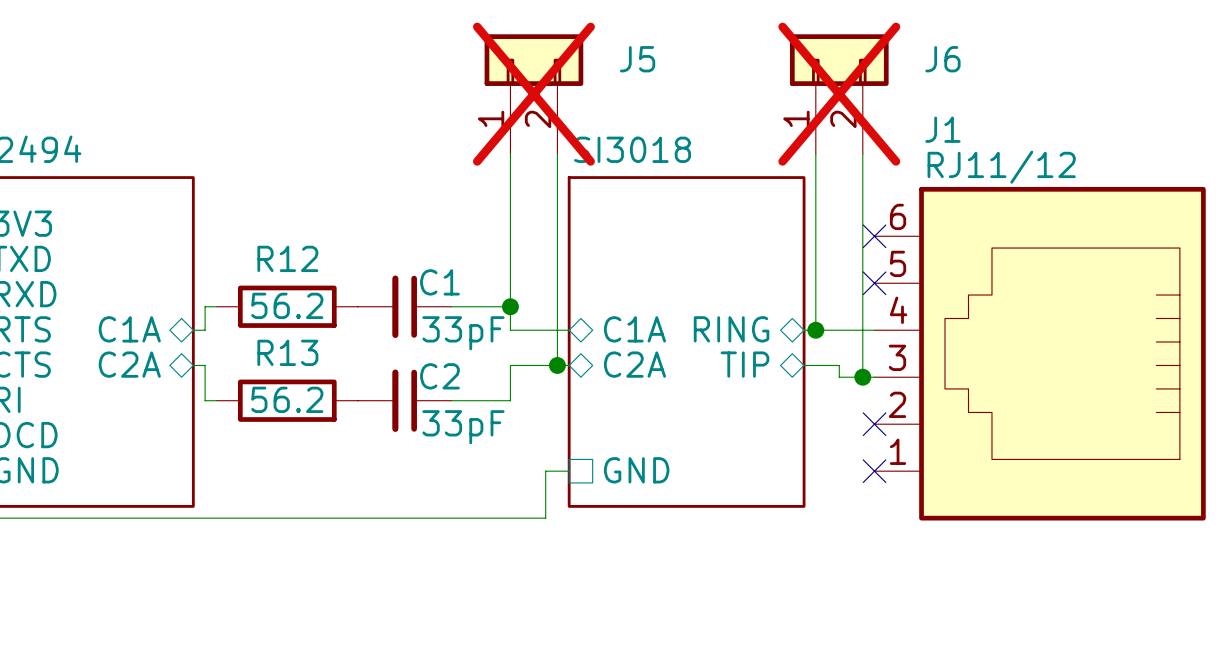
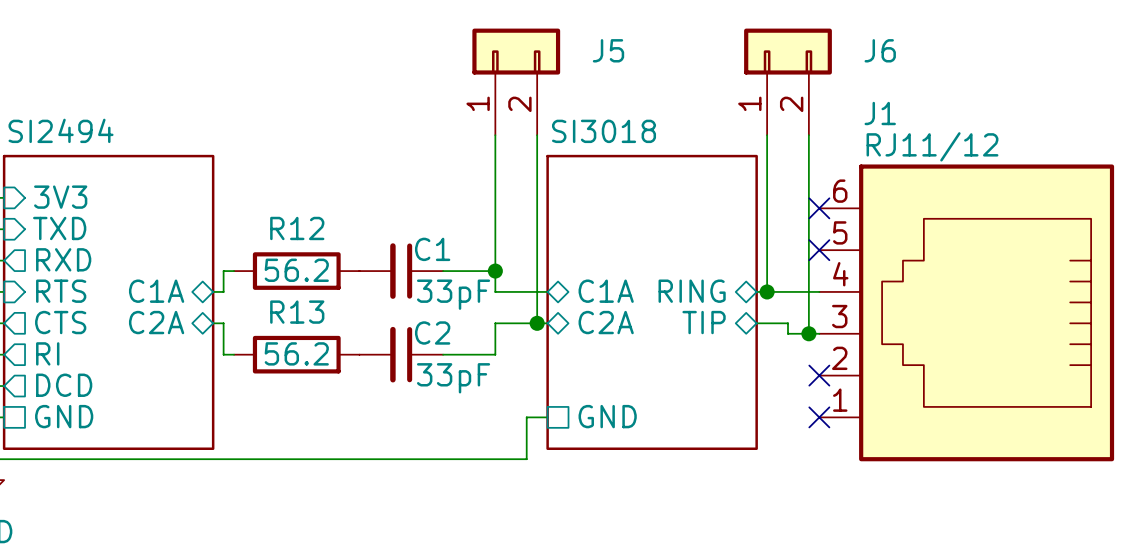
J5 do-not-place cross: (533, 94) -> none
J6 do-not-place cross: (839, 94) -> none

